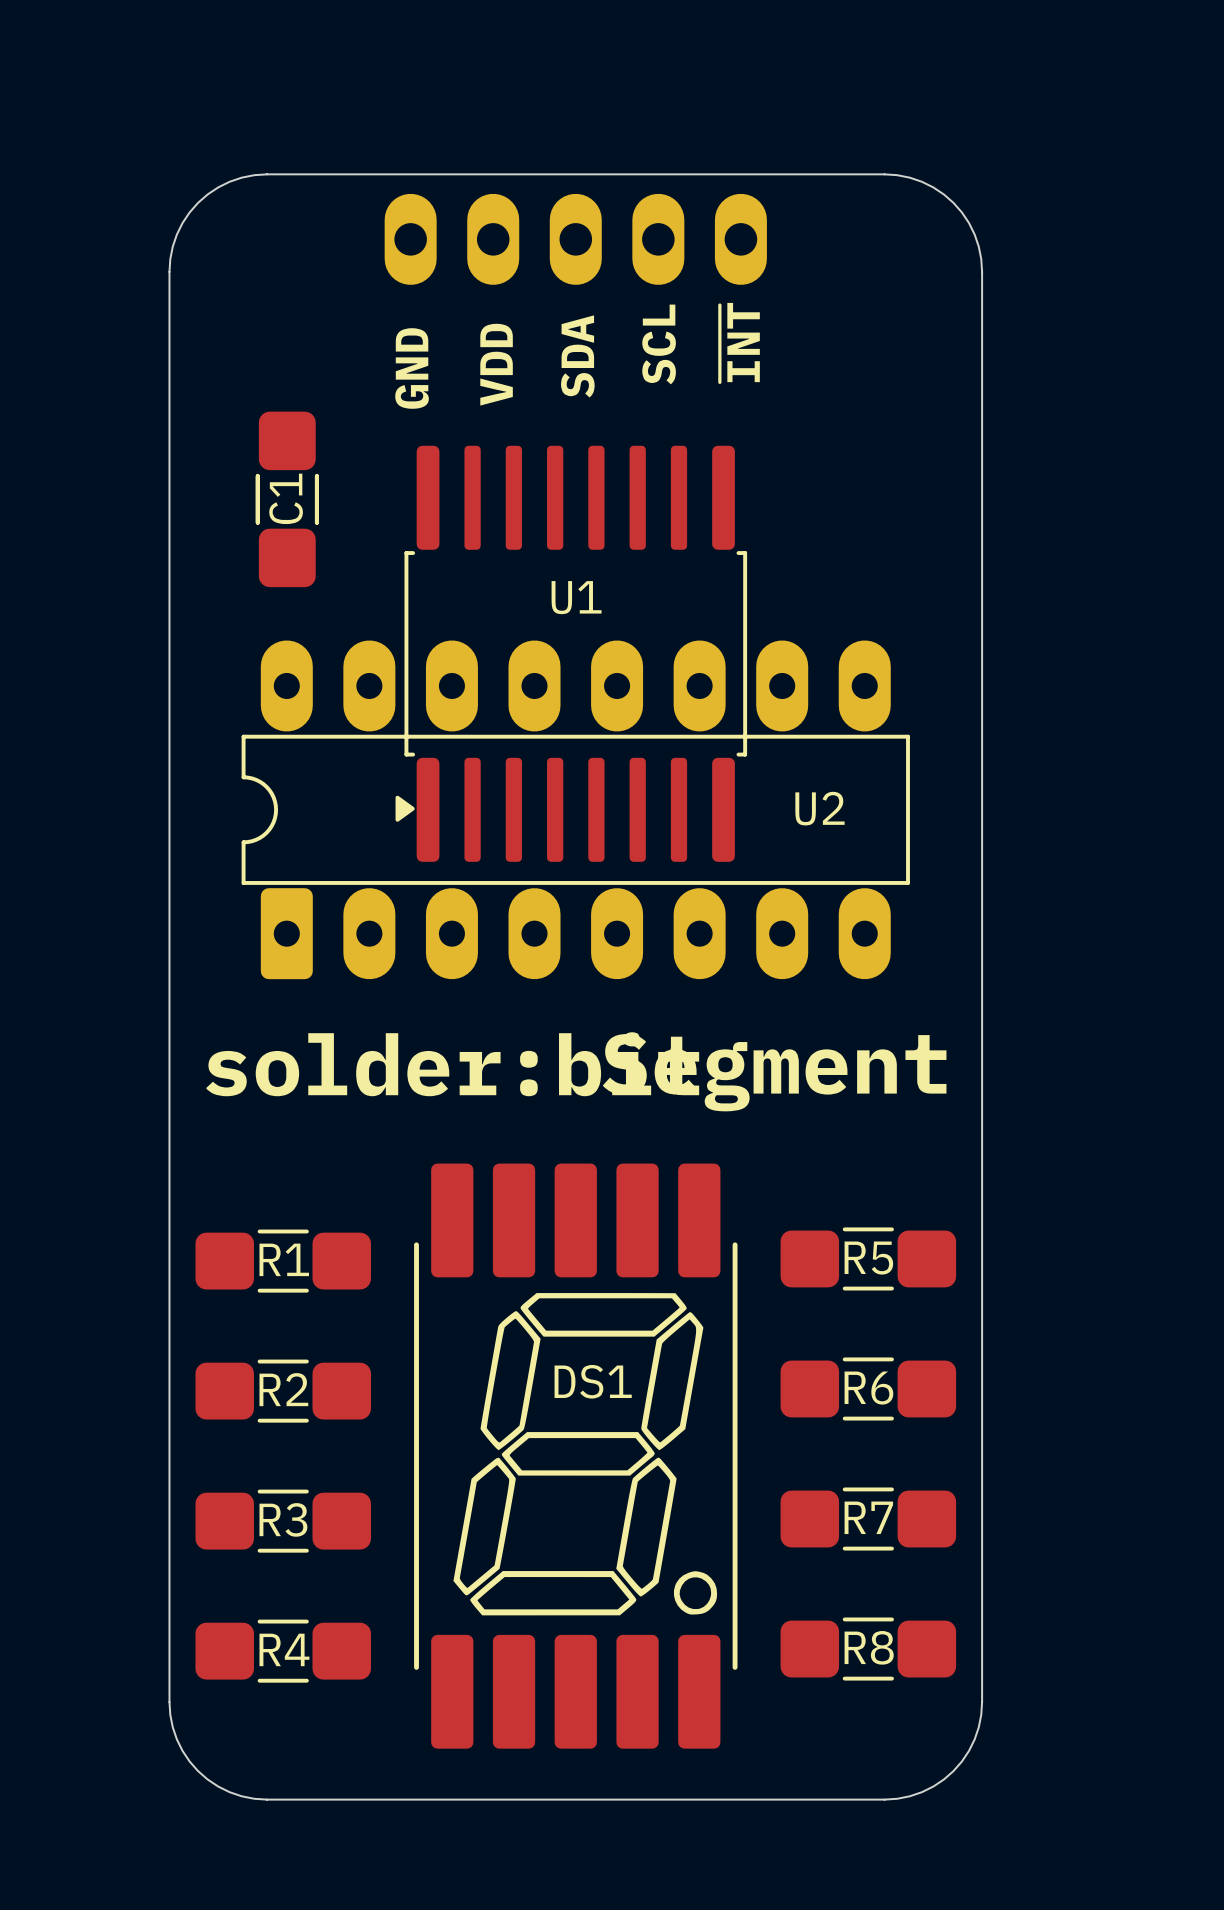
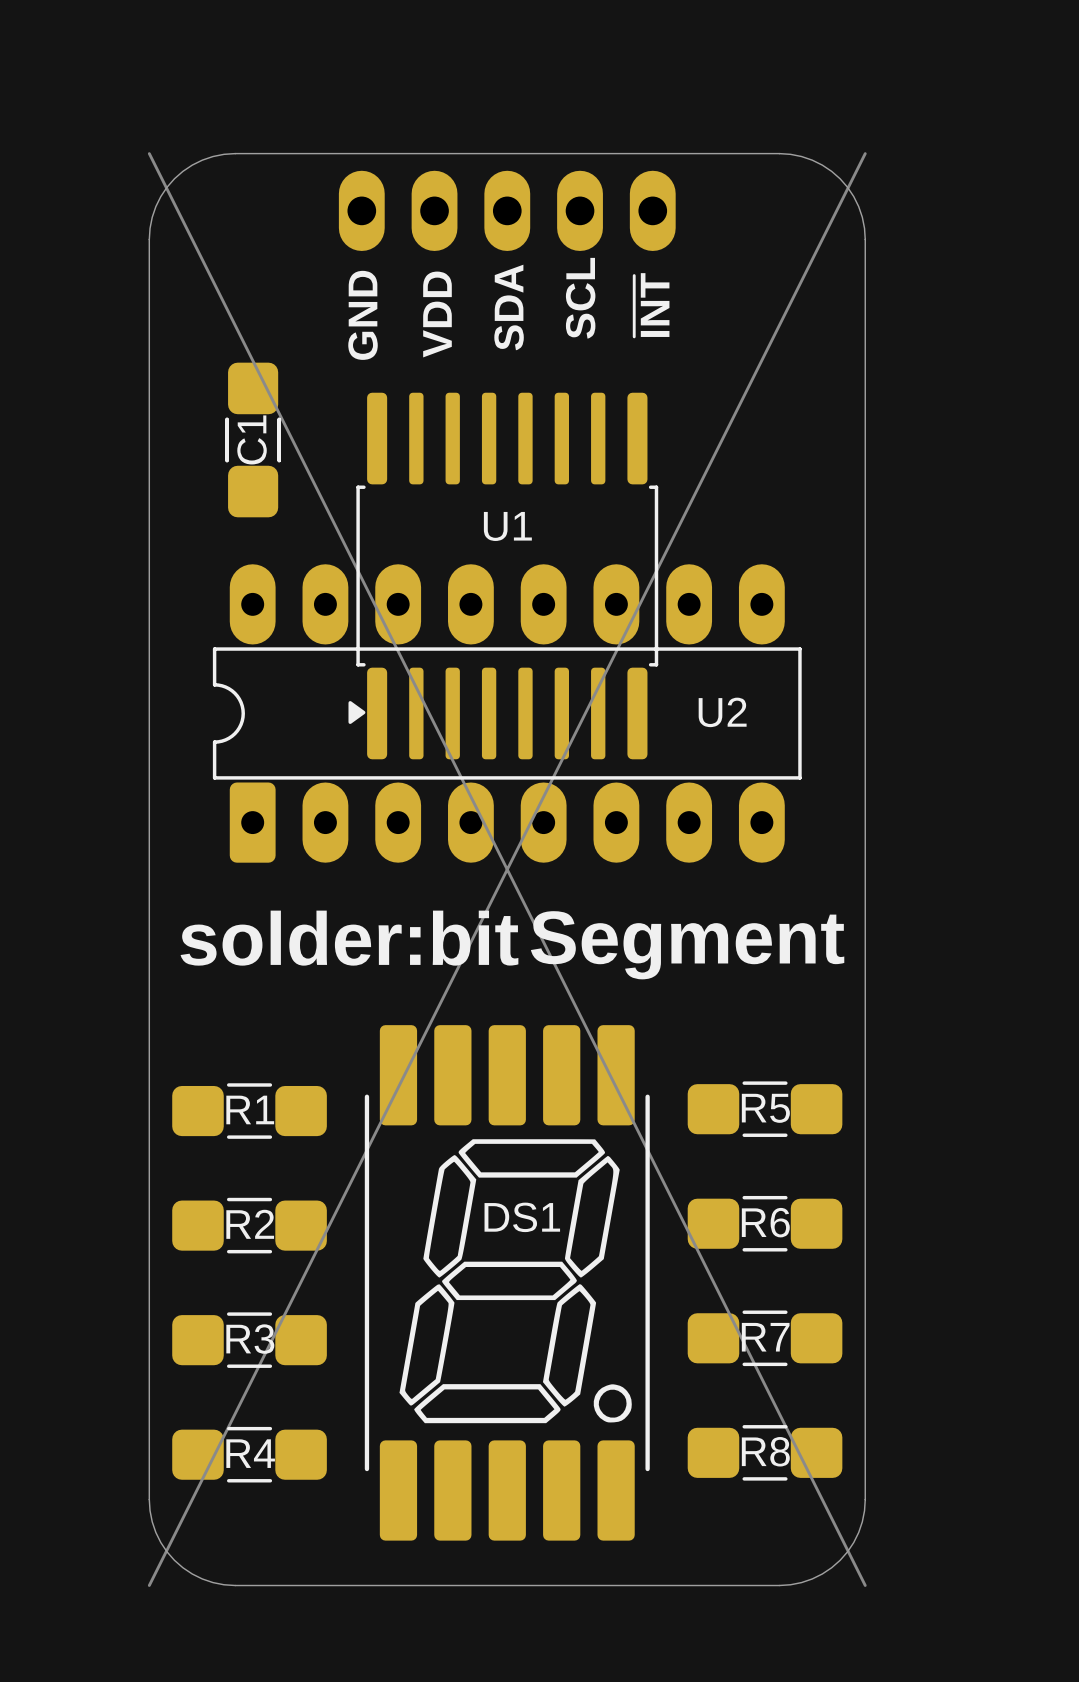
line: none -> (149, 153) (865, 1585)
line: none -> (865, 153) (149, 1585)

